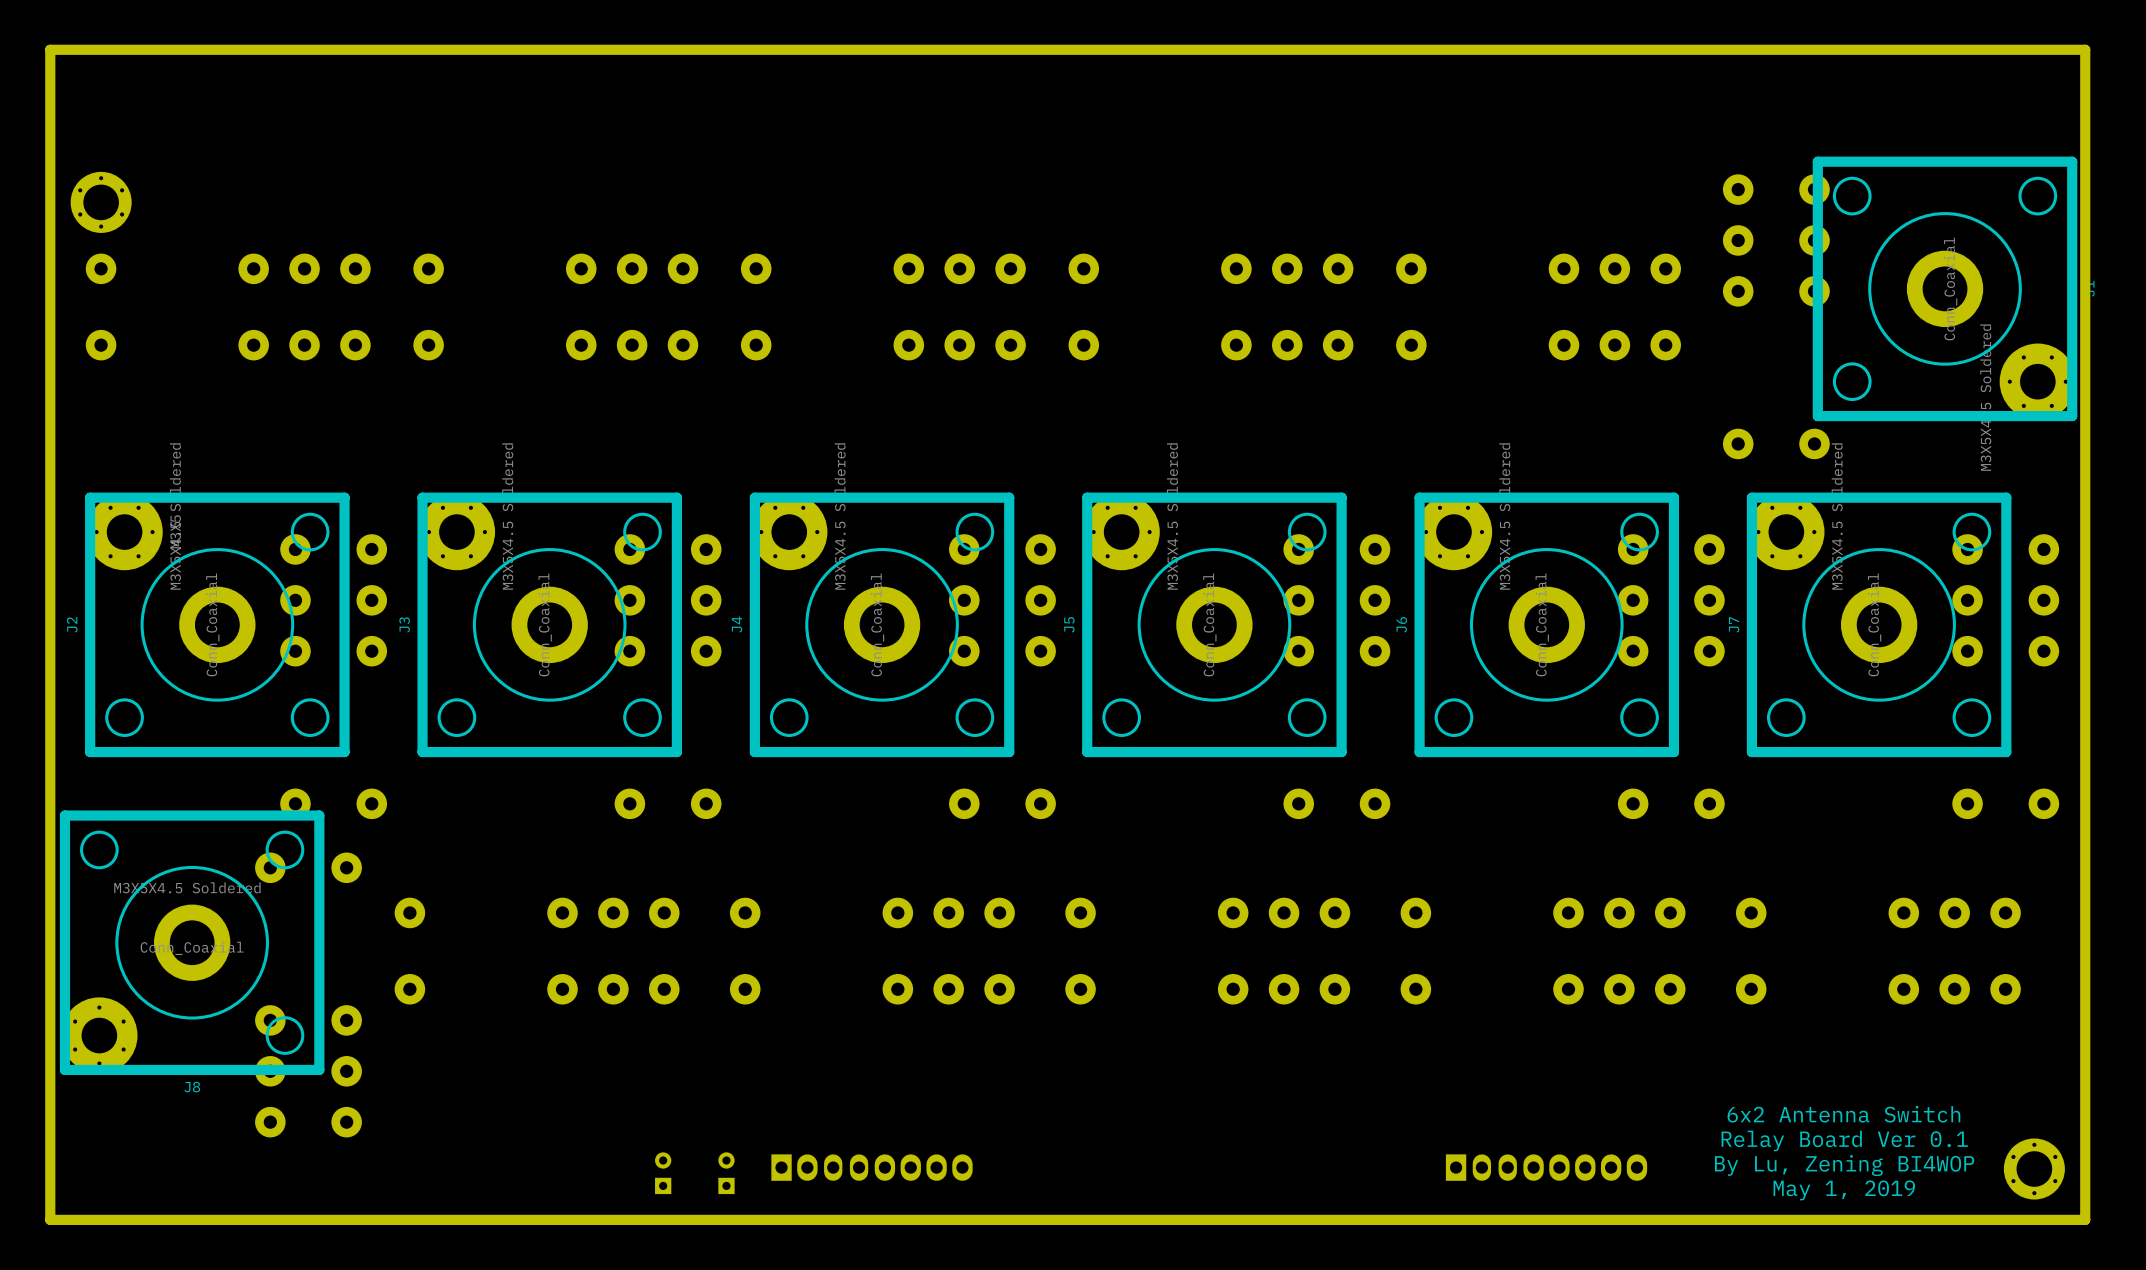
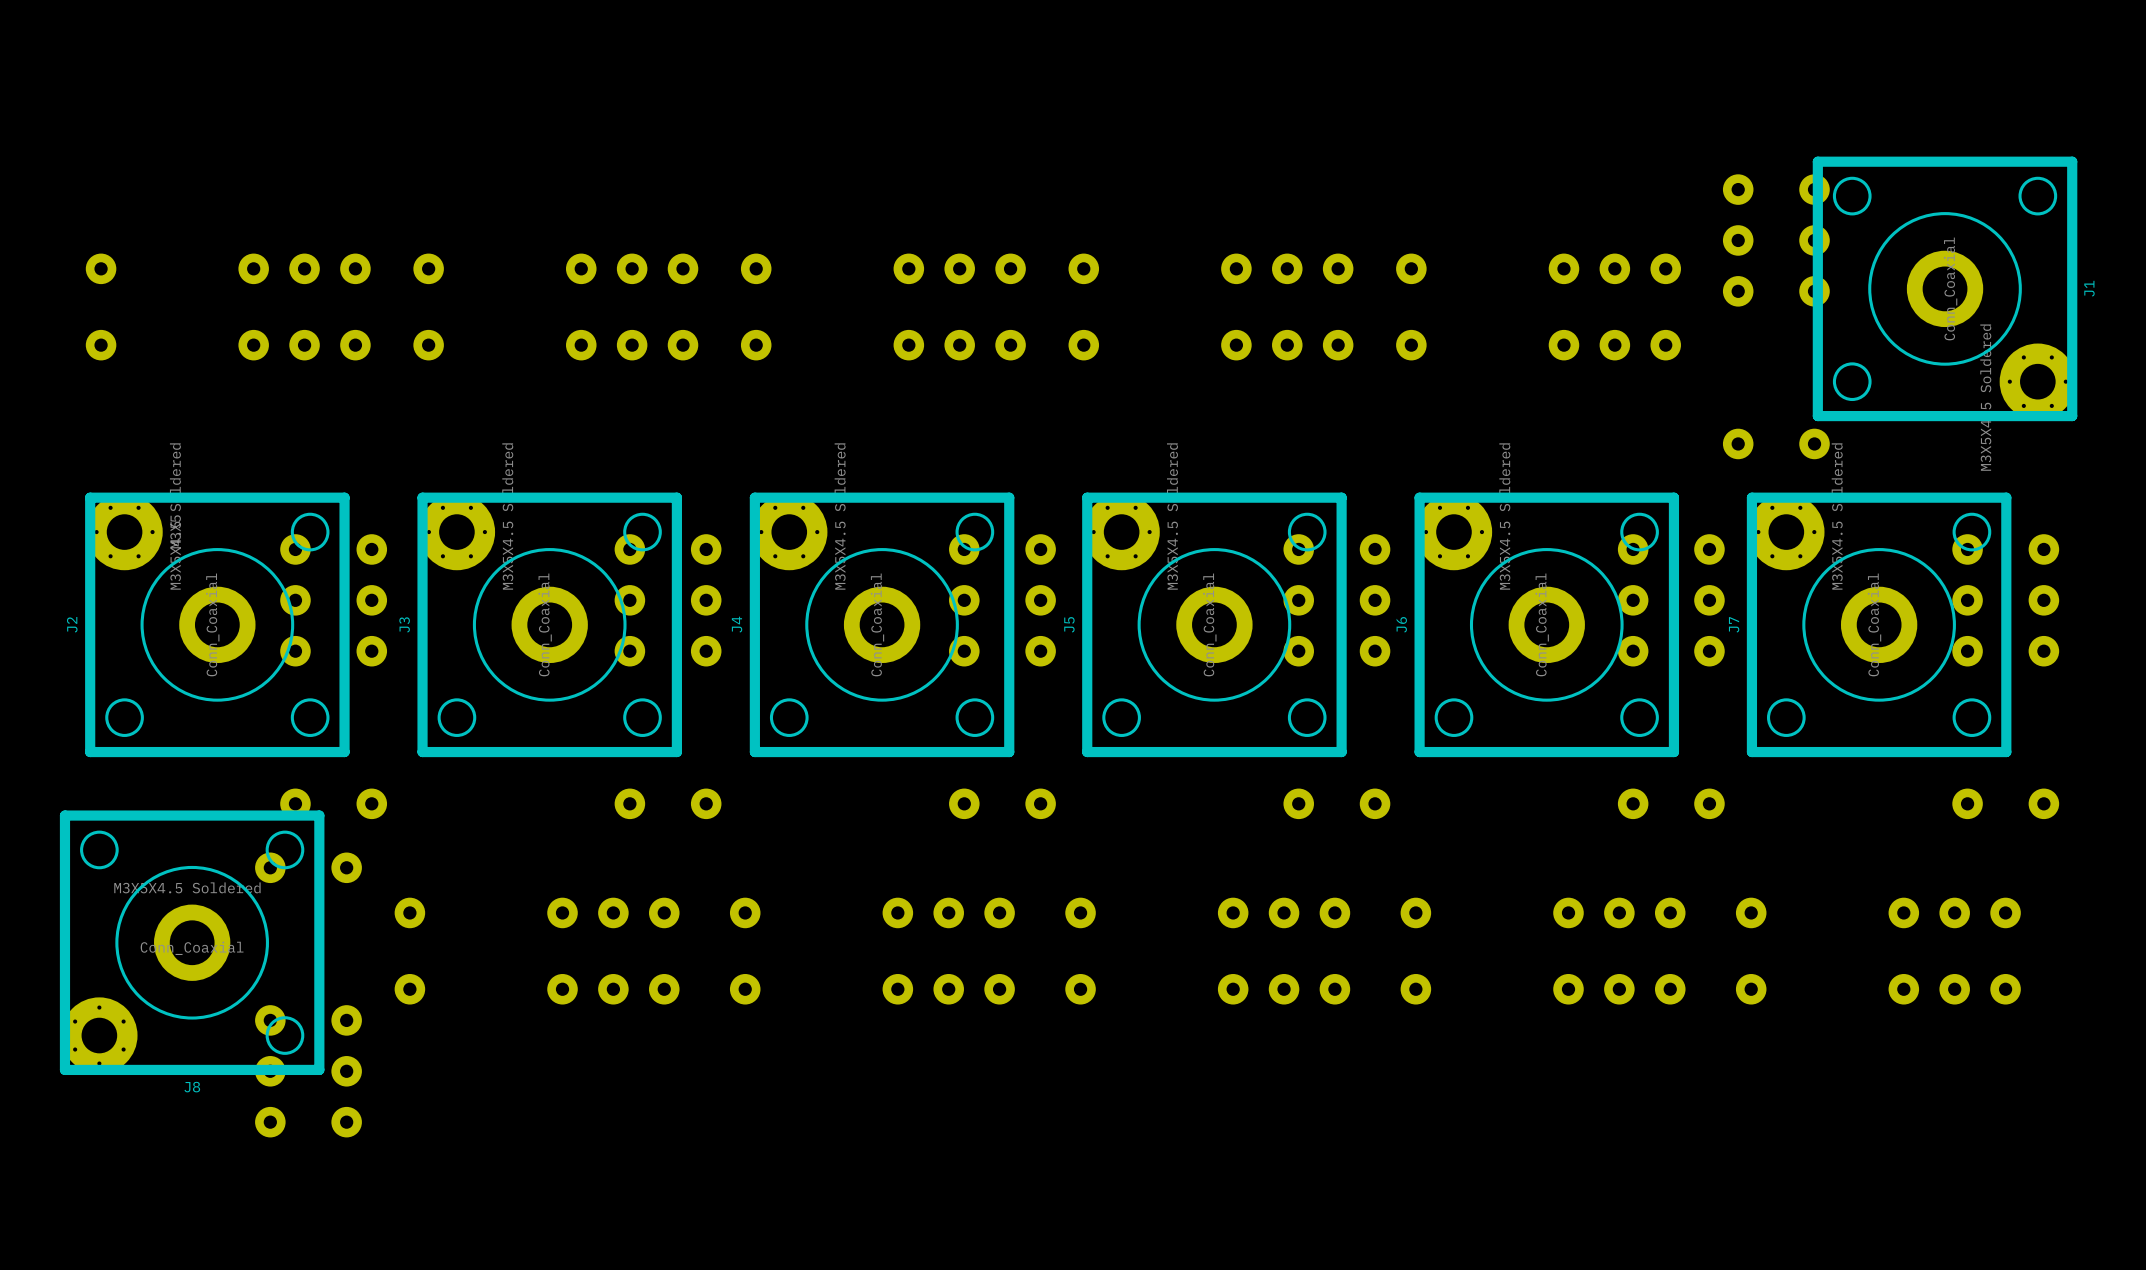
board edge: (50, 49) (2085, 49) (2085, 1219) (50, 1219) (50, 49) -> none
part: (101, 202) -> none
text: 6x2 Antenna Switch (1843, 1114) -> none
text: Relay Board Ver 0.1 (1844, 1140) -> none
text: By Lu, Zening BI4WOP (1844, 1165) -> none
part: (871, 1167) -> none
part: (1546, 1167) -> none
part: (2034, 1169) -> none
part: (663, 1173) -> none
part: (726, 1173) -> none
text: May 1, 2019 (1844, 1190) -> none

